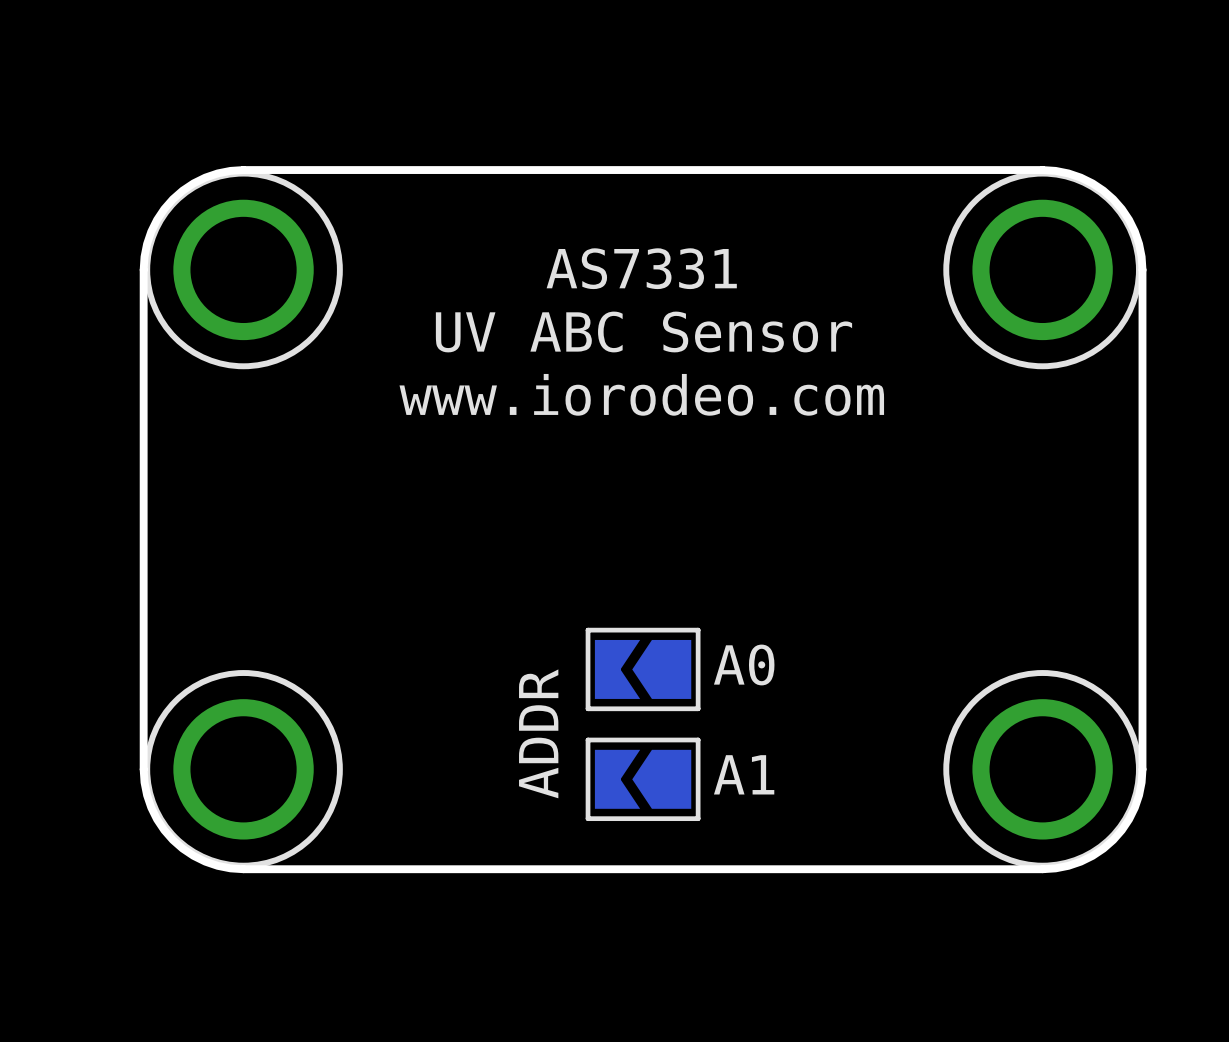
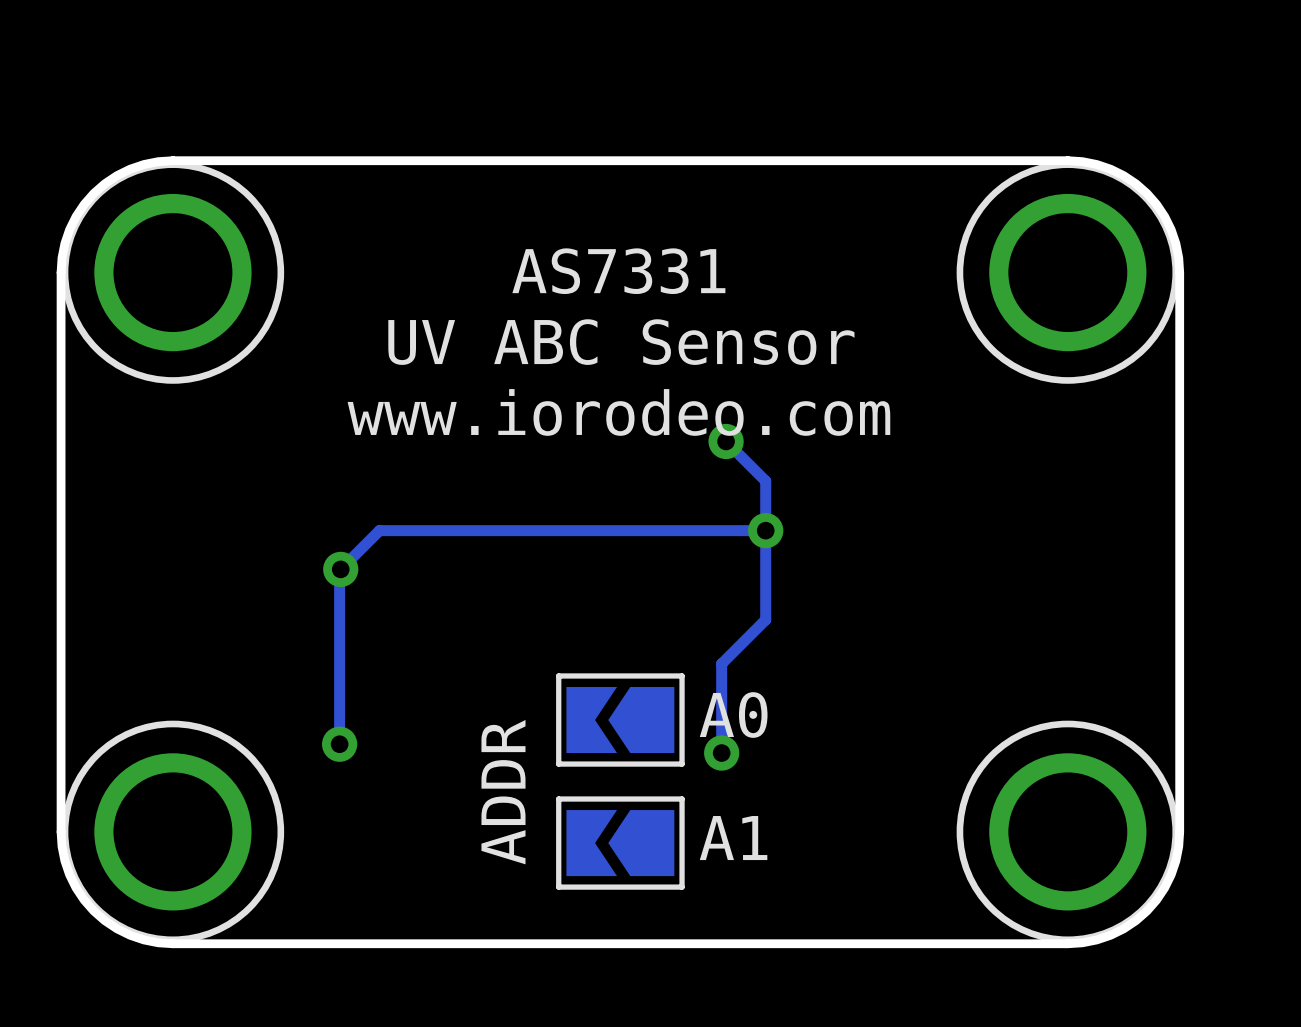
track: none -> (726, 441) (765, 481) (765, 619) (721, 663) (721, 753)
via: none -> (726, 441)
track: none -> (765, 530) (379, 530) (339, 570) (339, 744)
via: none -> (765, 530)
via: none -> (340, 569)
via: none -> (339, 744)
via: none -> (721, 753)

